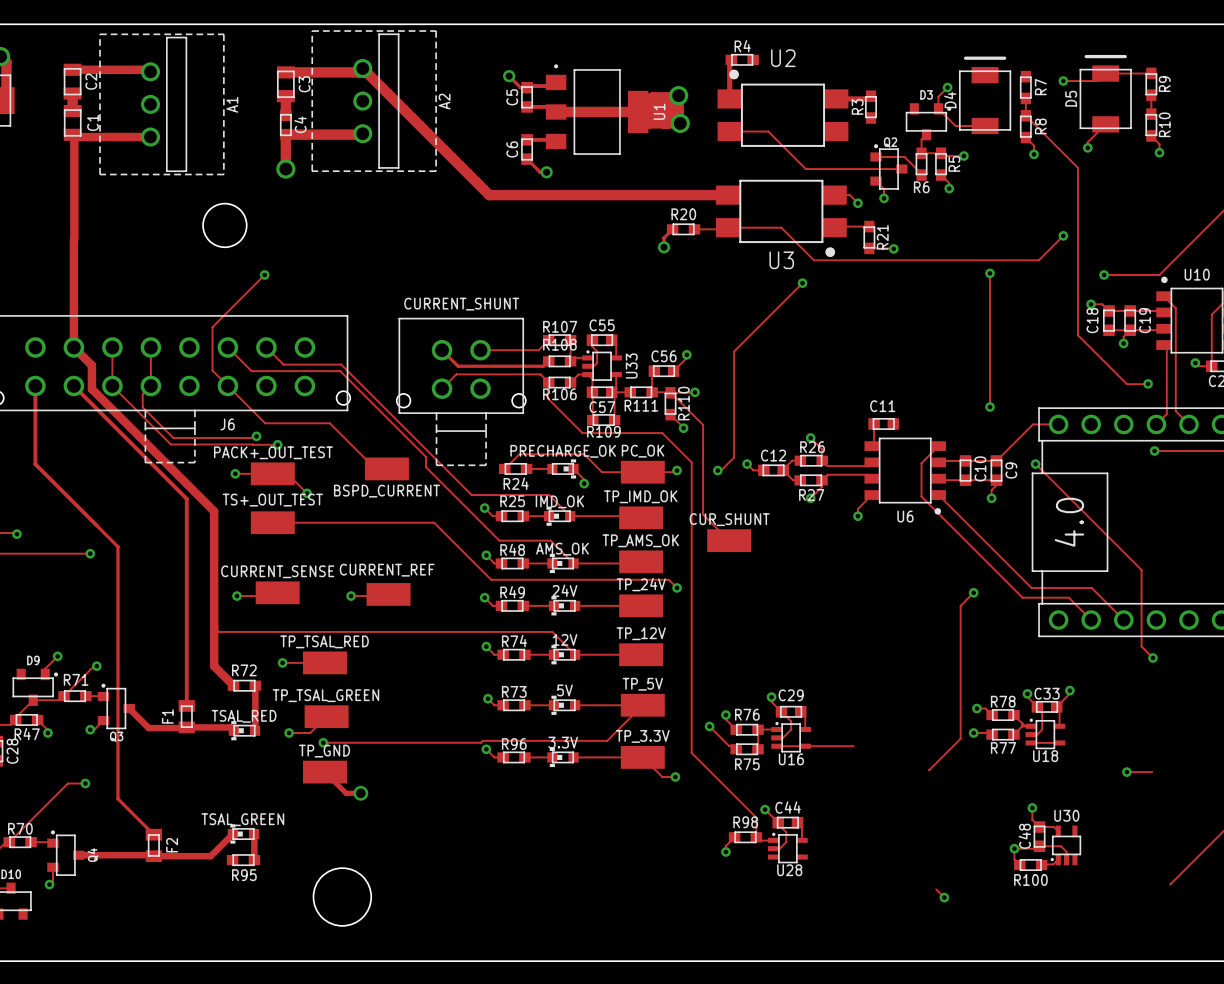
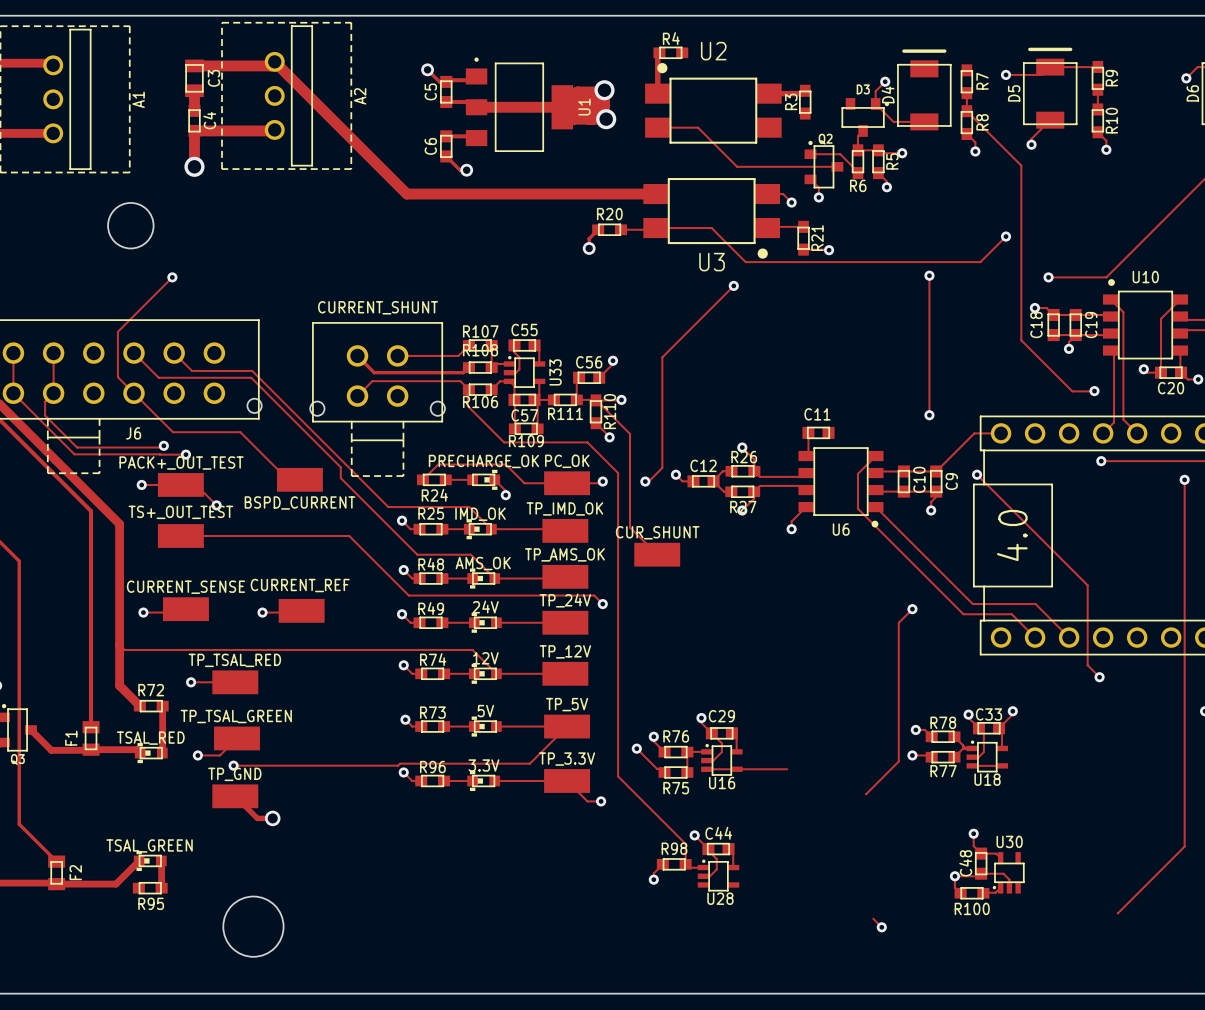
track: (1126, 772) (1152, 772) -> none
via: (1126, 772) -> none

